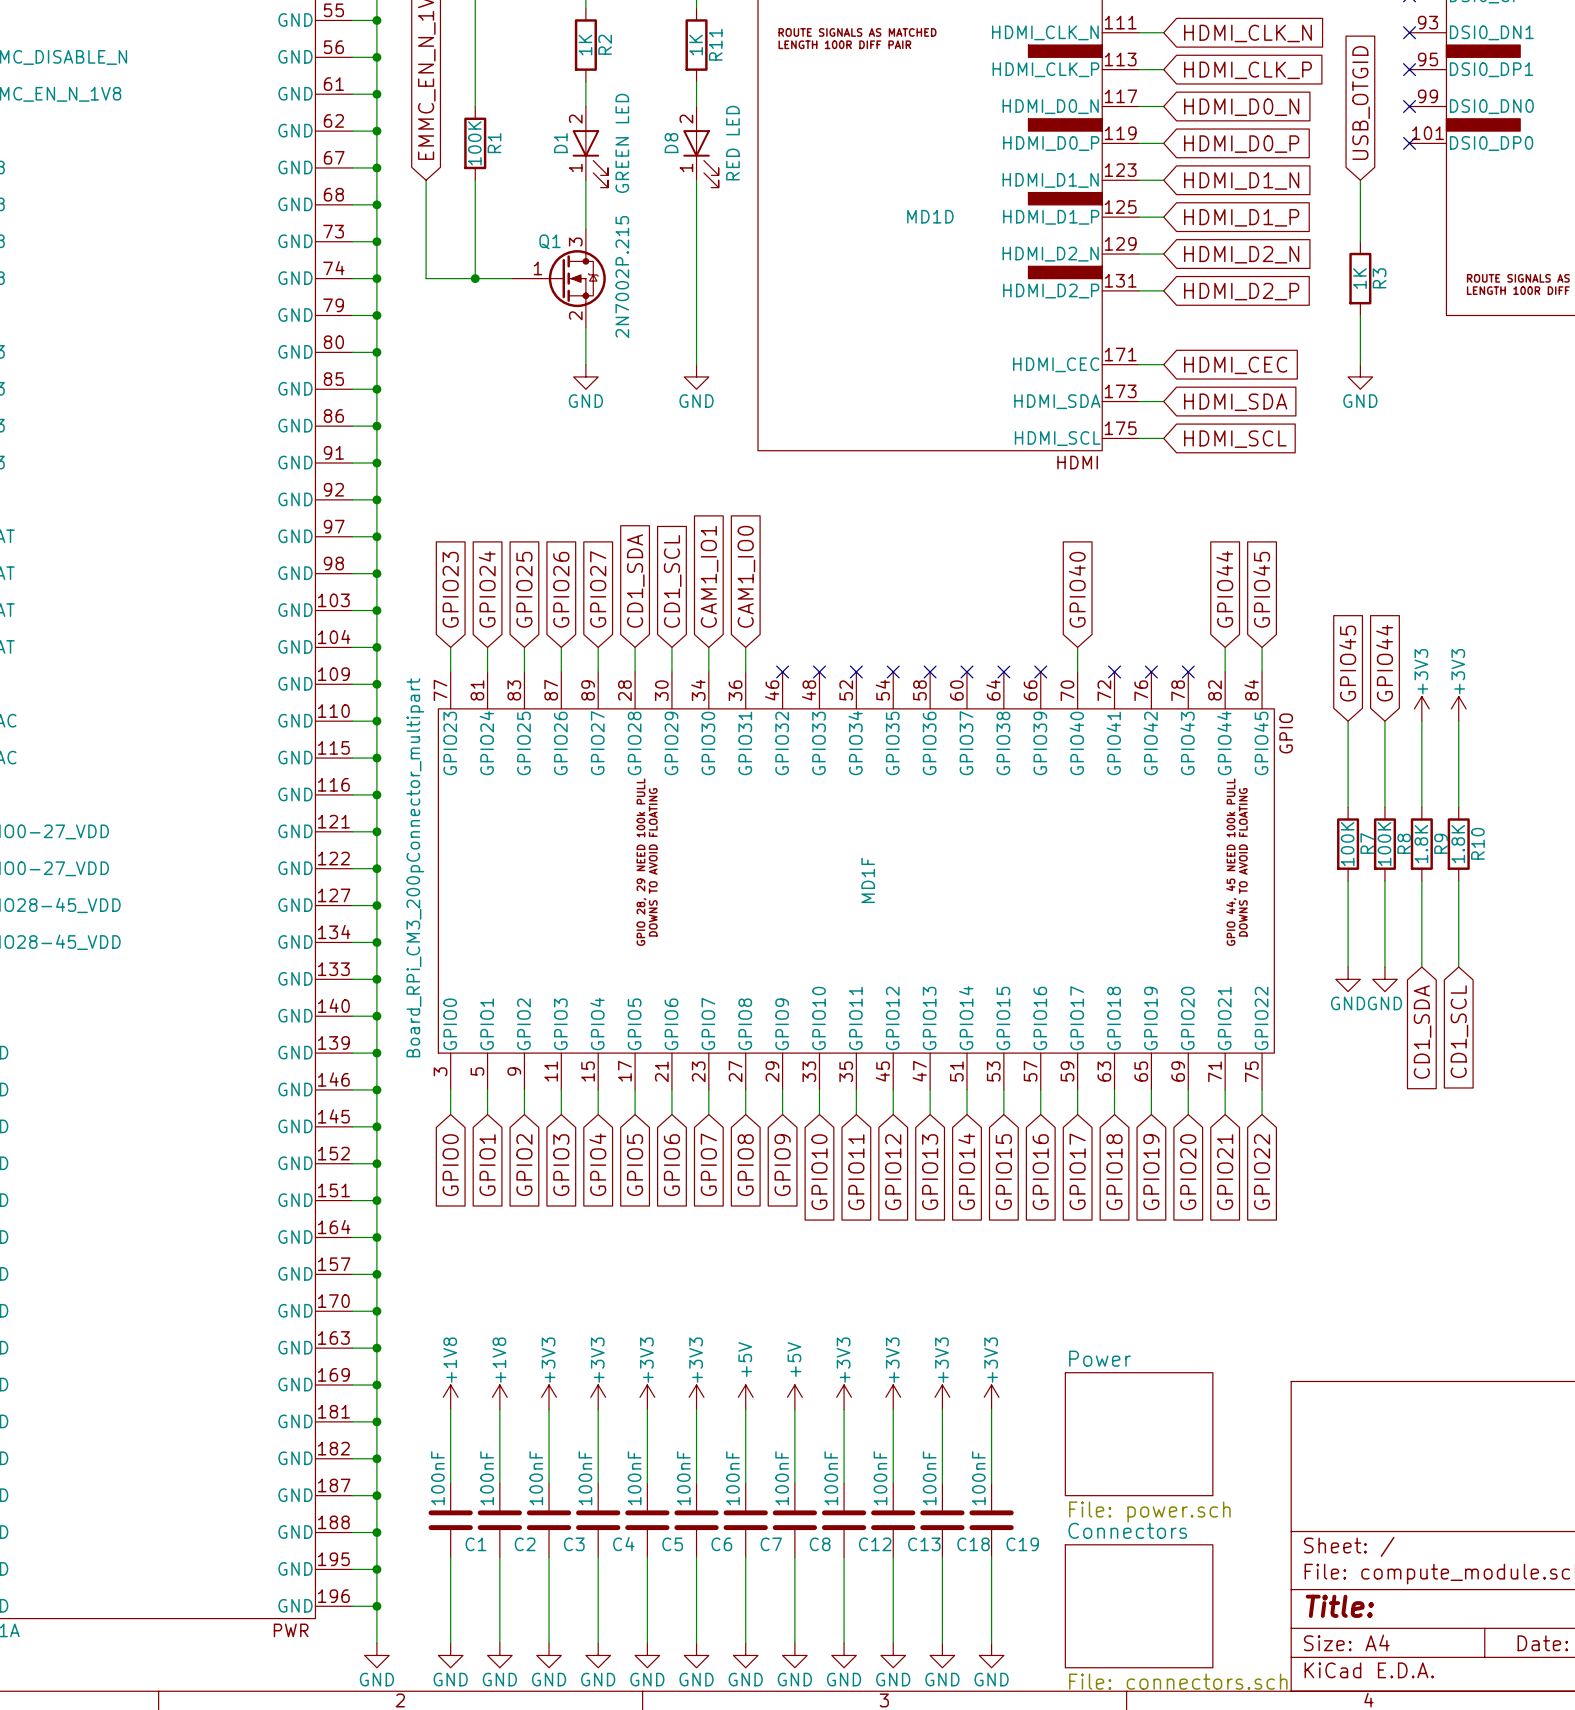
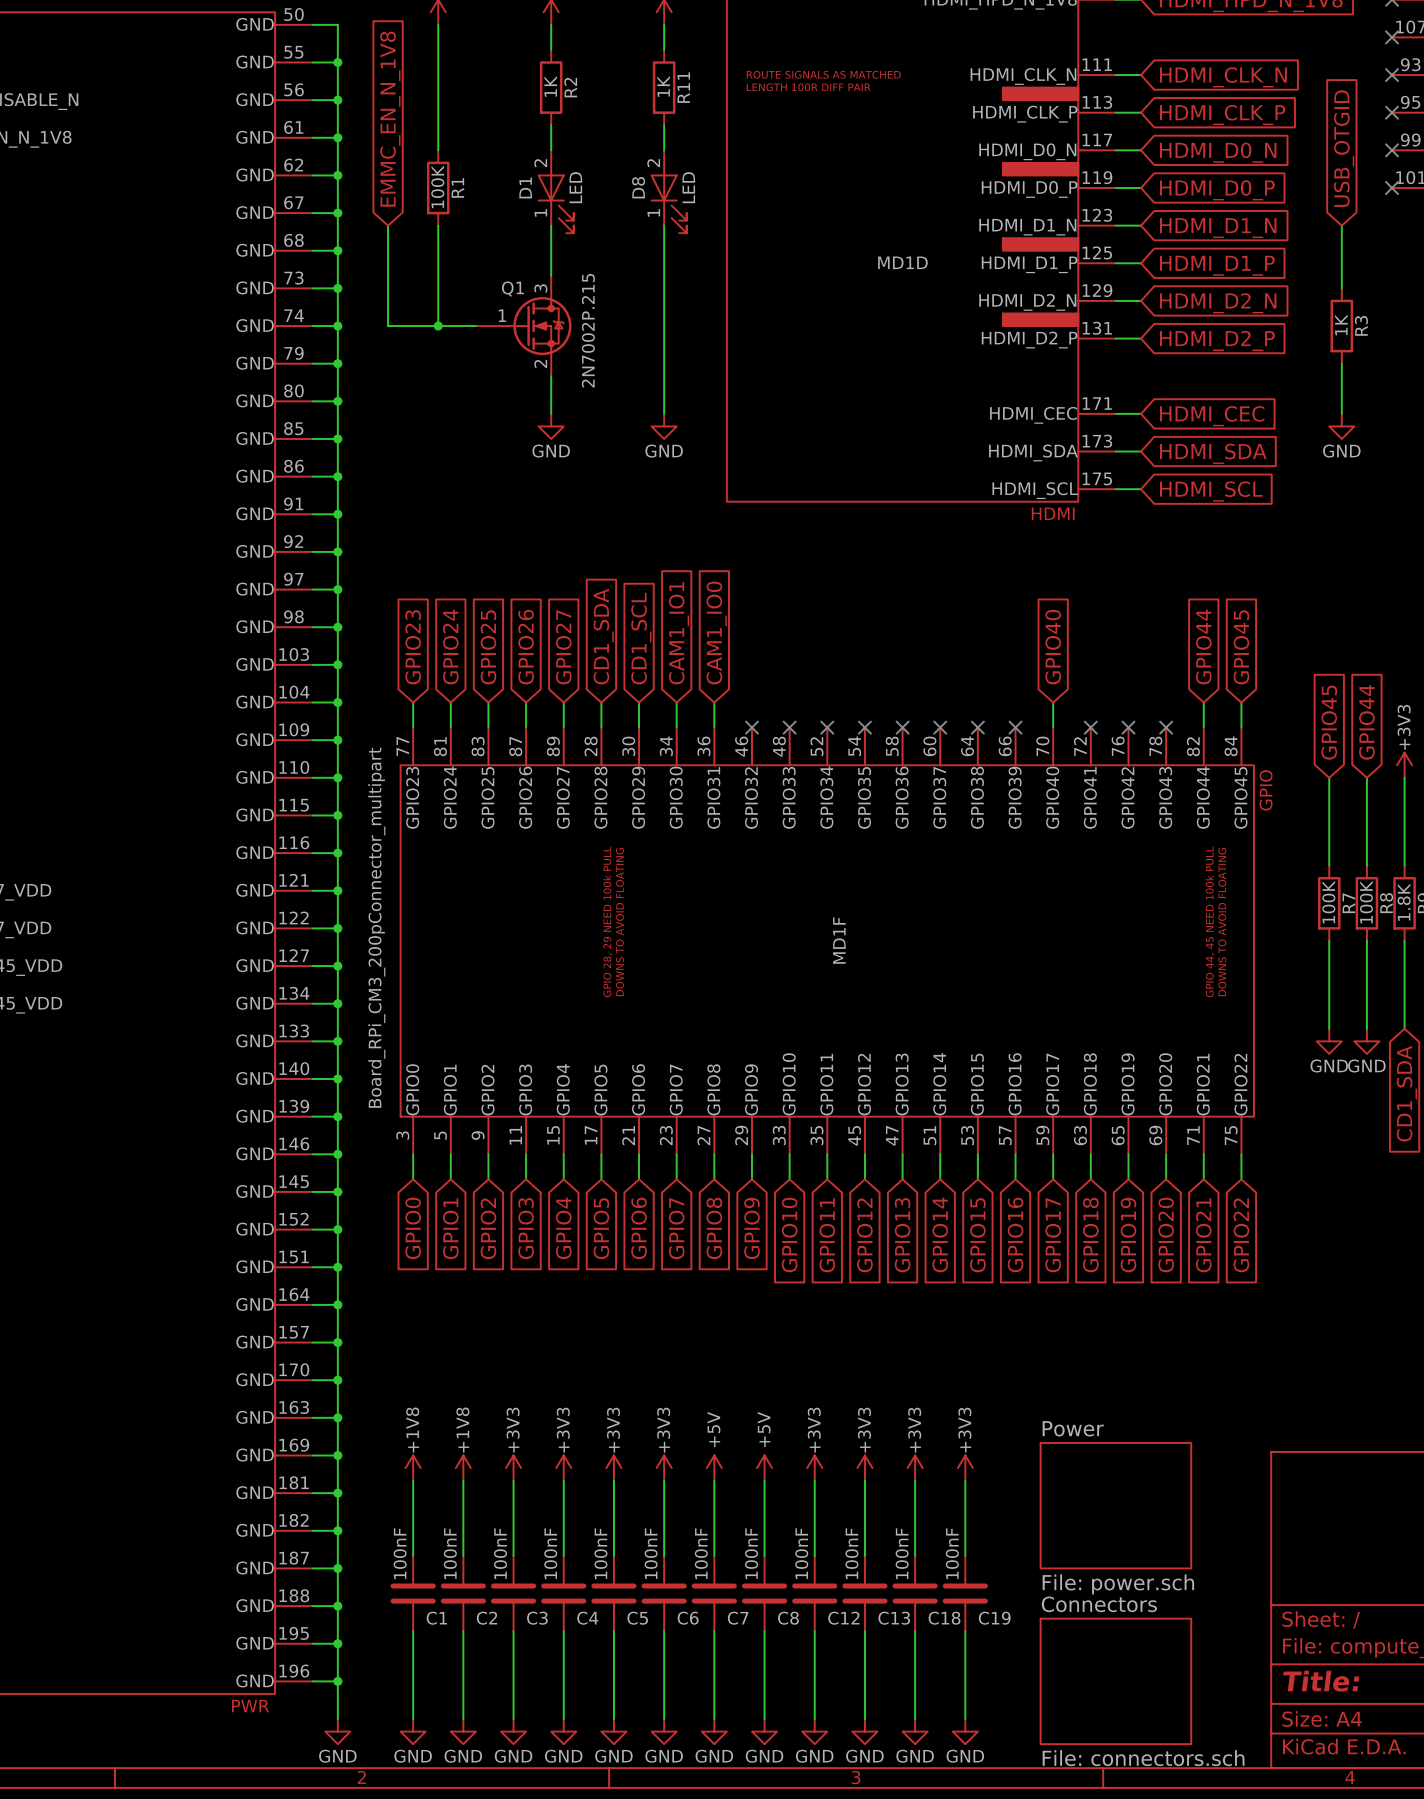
D1 value: GREEN LED (622, 143) -> LED (575, 187)
D8 value: RED LED (732, 143) -> LED (688, 187)

